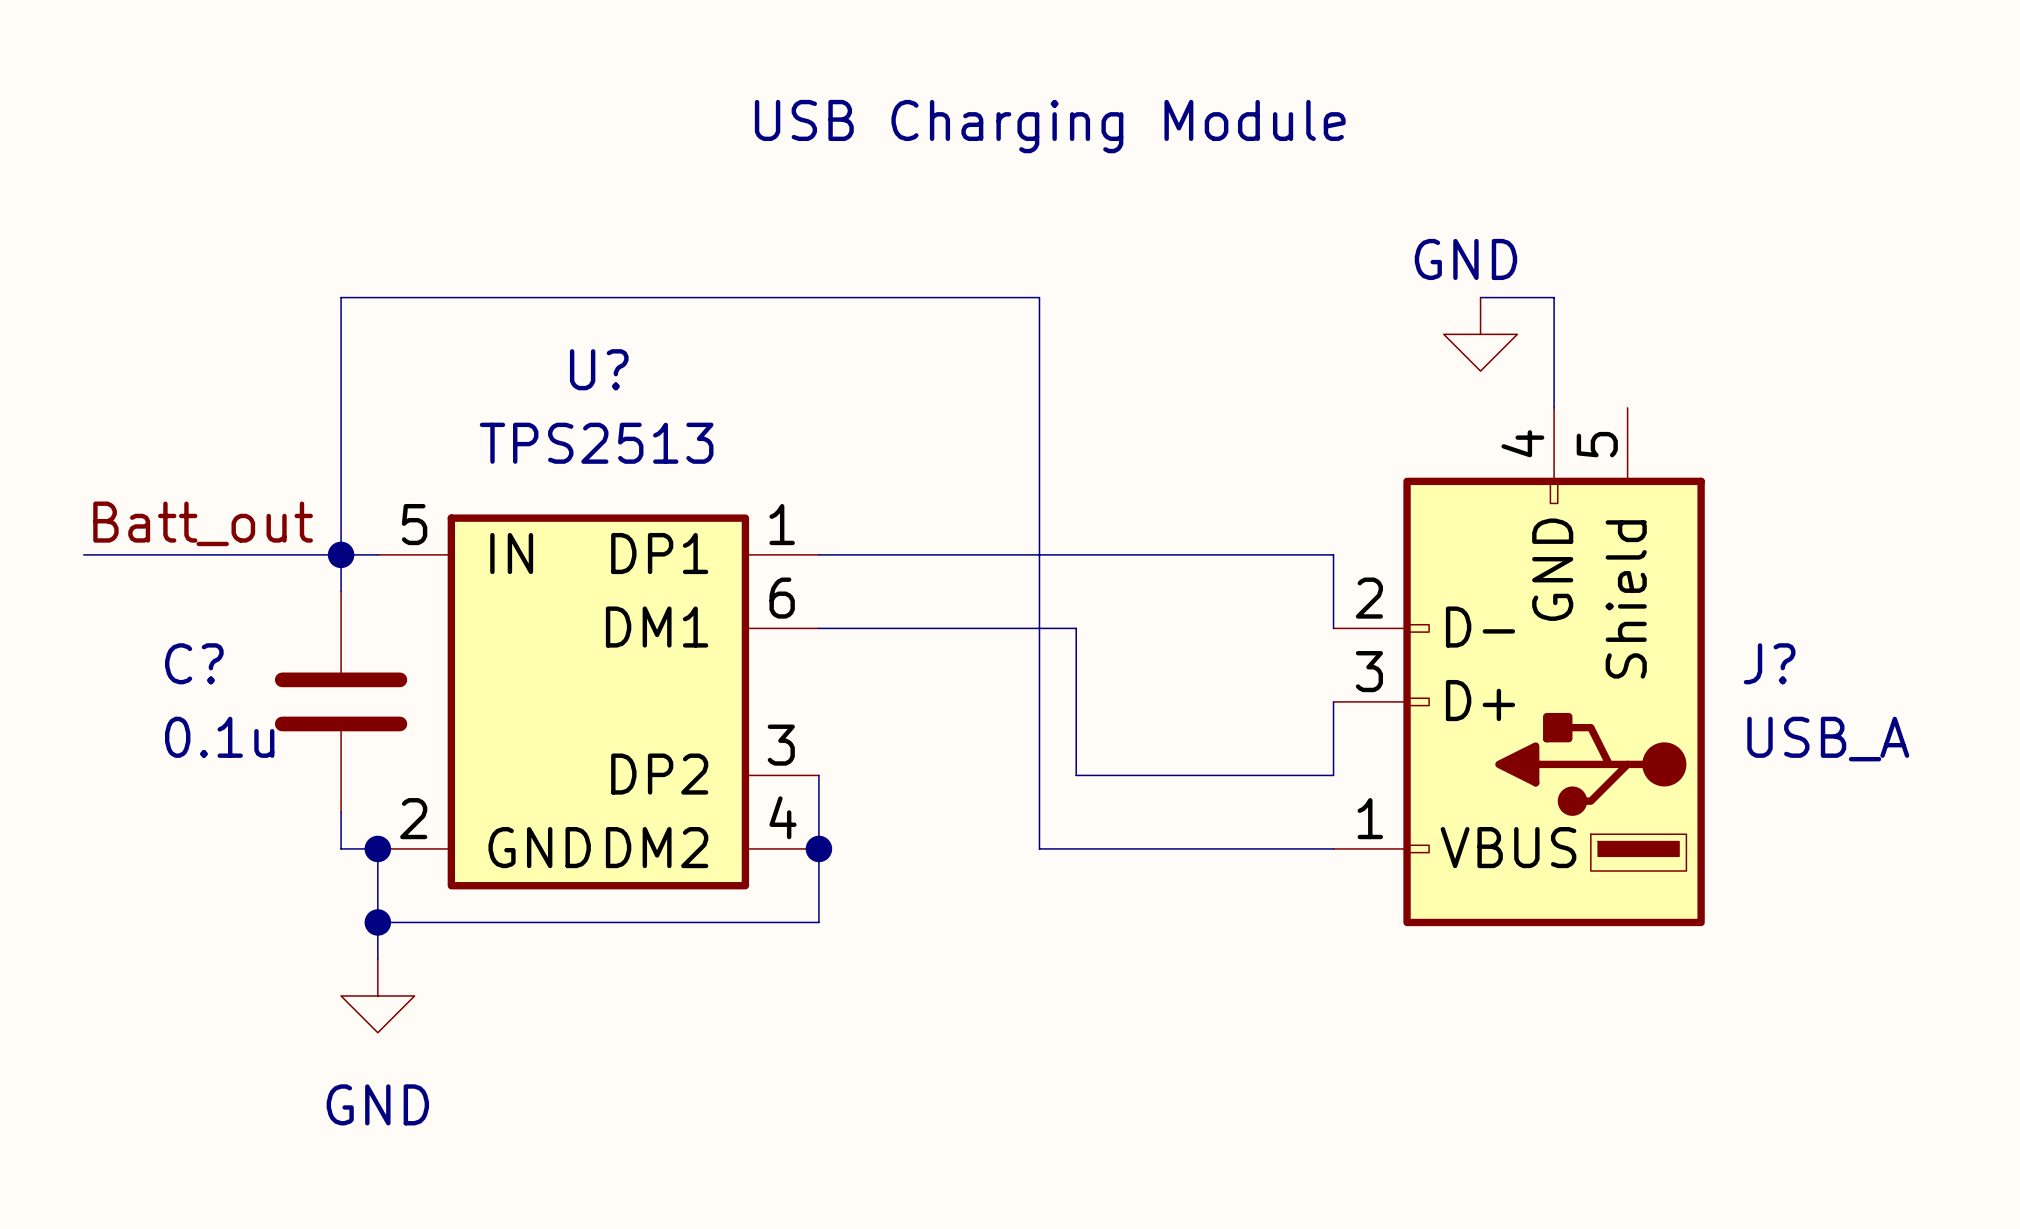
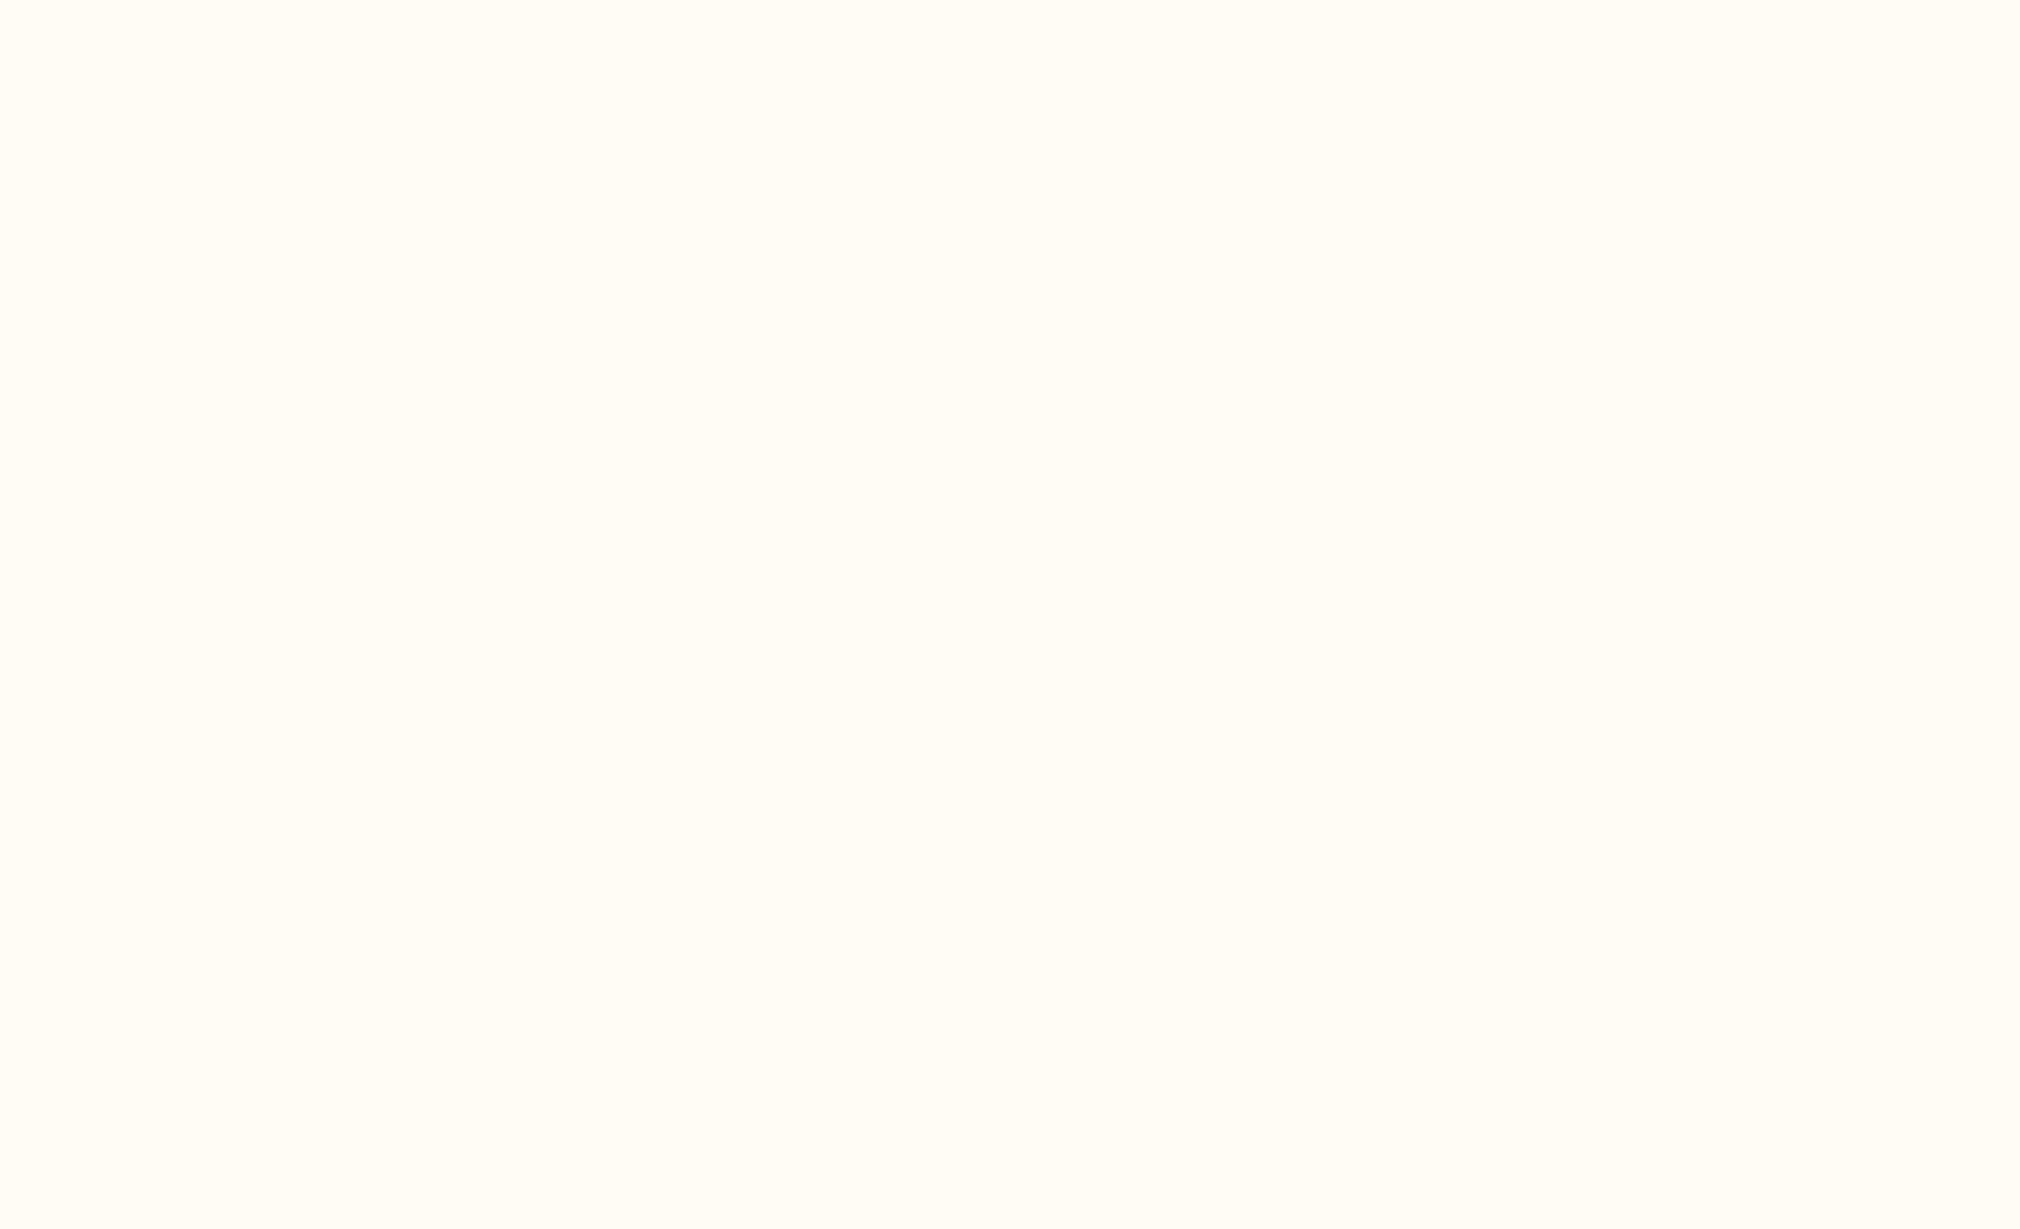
text: USB Charging Module (1050, 126) -> none
wire: (1480, 297) (1554, 297) (1554, 407) -> none
power symbol: GND (1480, 334) -> none
label: Batt_out (203, 523) -> none
wire: (83, 554) (377, 554) -> none
junction: (341, 554) -> none
wire: (818, 554) (1333, 554) (1333, 628) -> none
wire: (341, 591) (341, 297) (1039, 297) (1039, 848) (1333, 848) -> none
wire: (818, 628) (1076, 628) (1076, 775) (1333, 775) (1333, 701) -> none
J?: USB_A (1519, 667) -> none
C?: 0.1u (341, 701) -> none
U?: TPS2513 (598, 701) -> none
wire: (818, 775) (818, 922) (377, 922) -> none
wire: (341, 812) (341, 848) (377, 848) (377, 959) -> none
junction: (377, 848) -> none
junction: (818, 848) -> none
junction: (377, 922) -> none
power symbol: GND (377, 995) -> none

